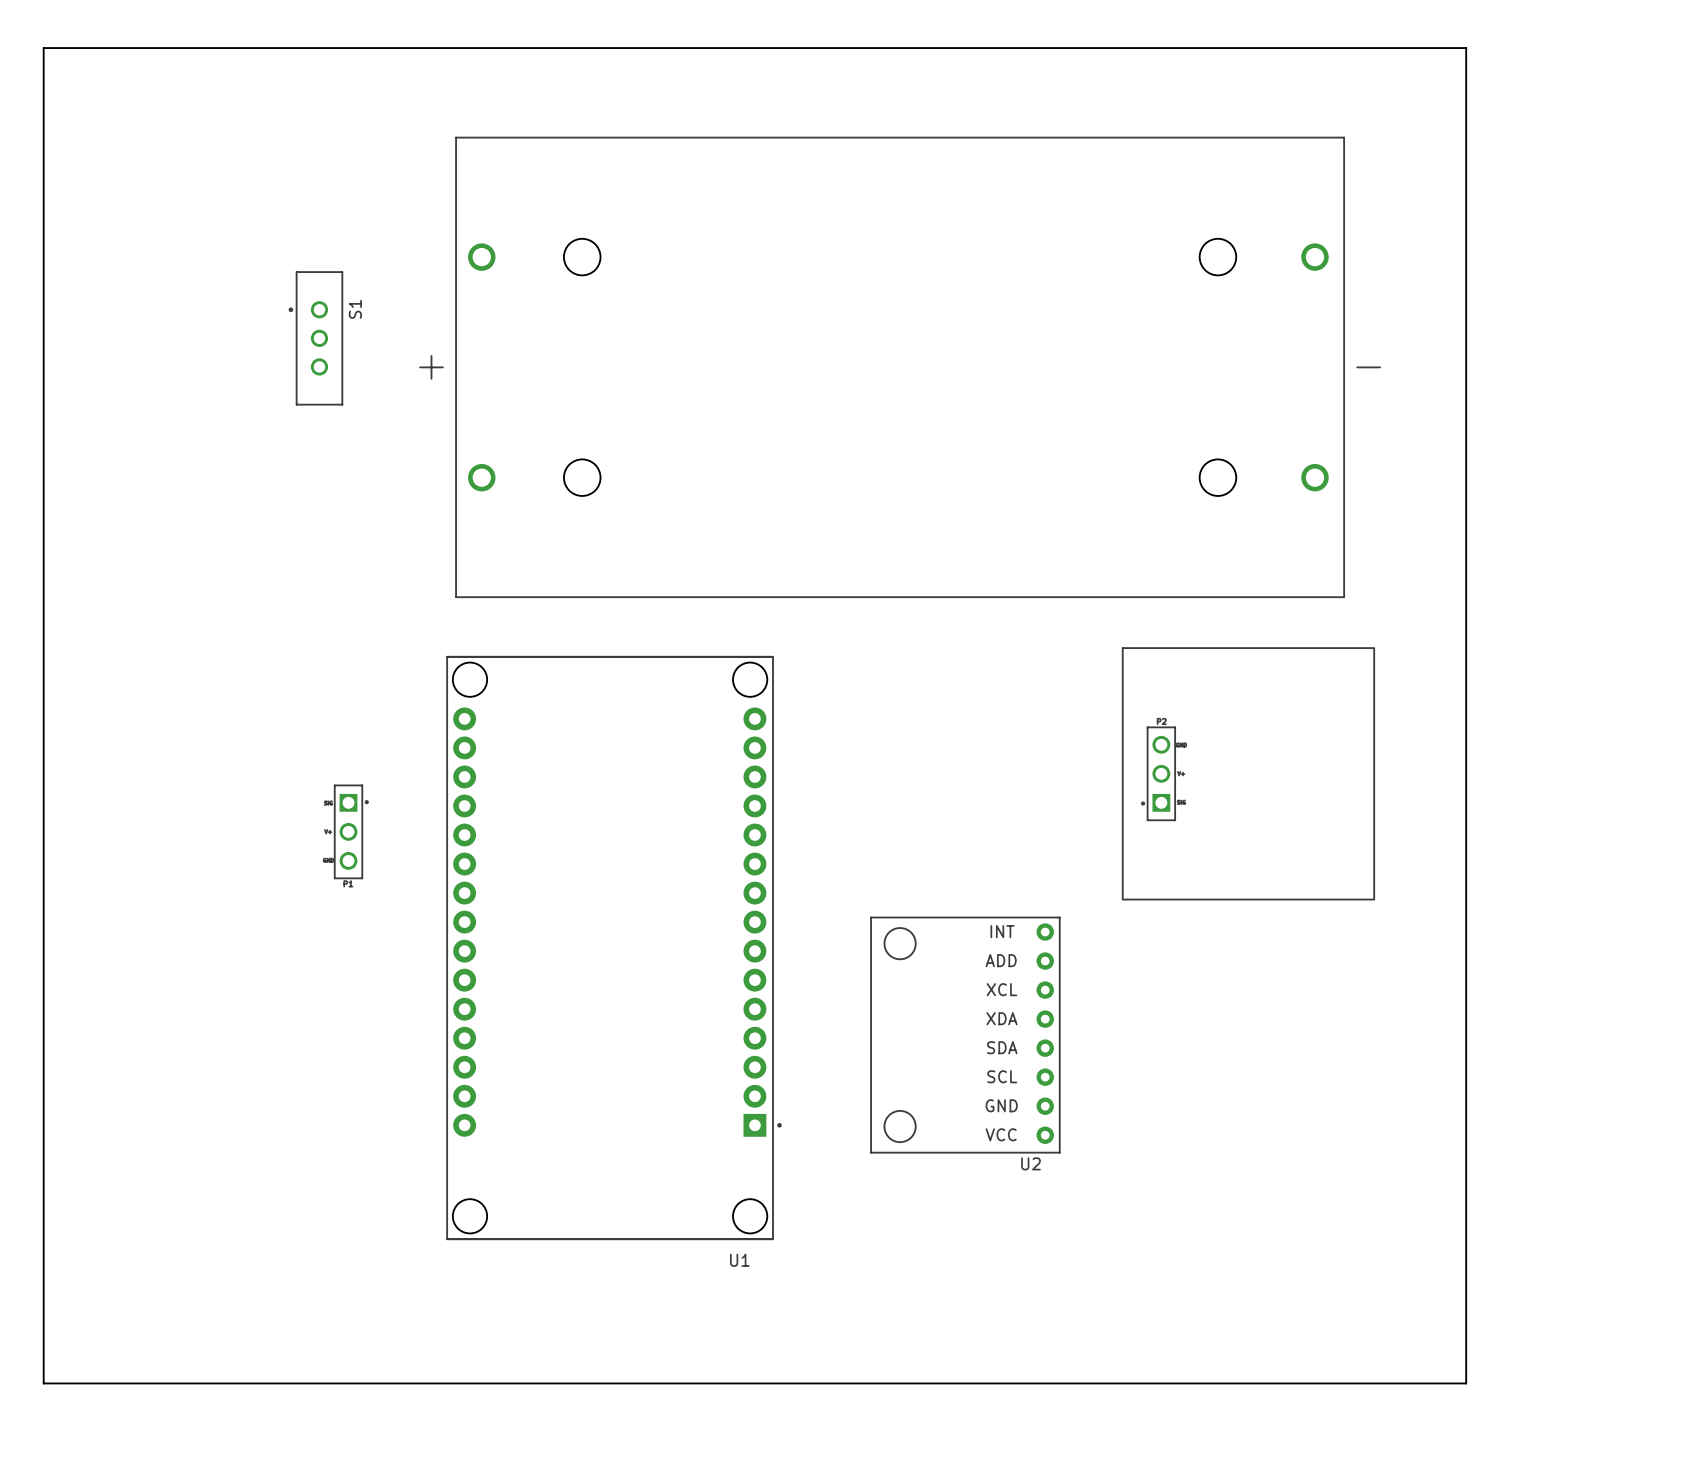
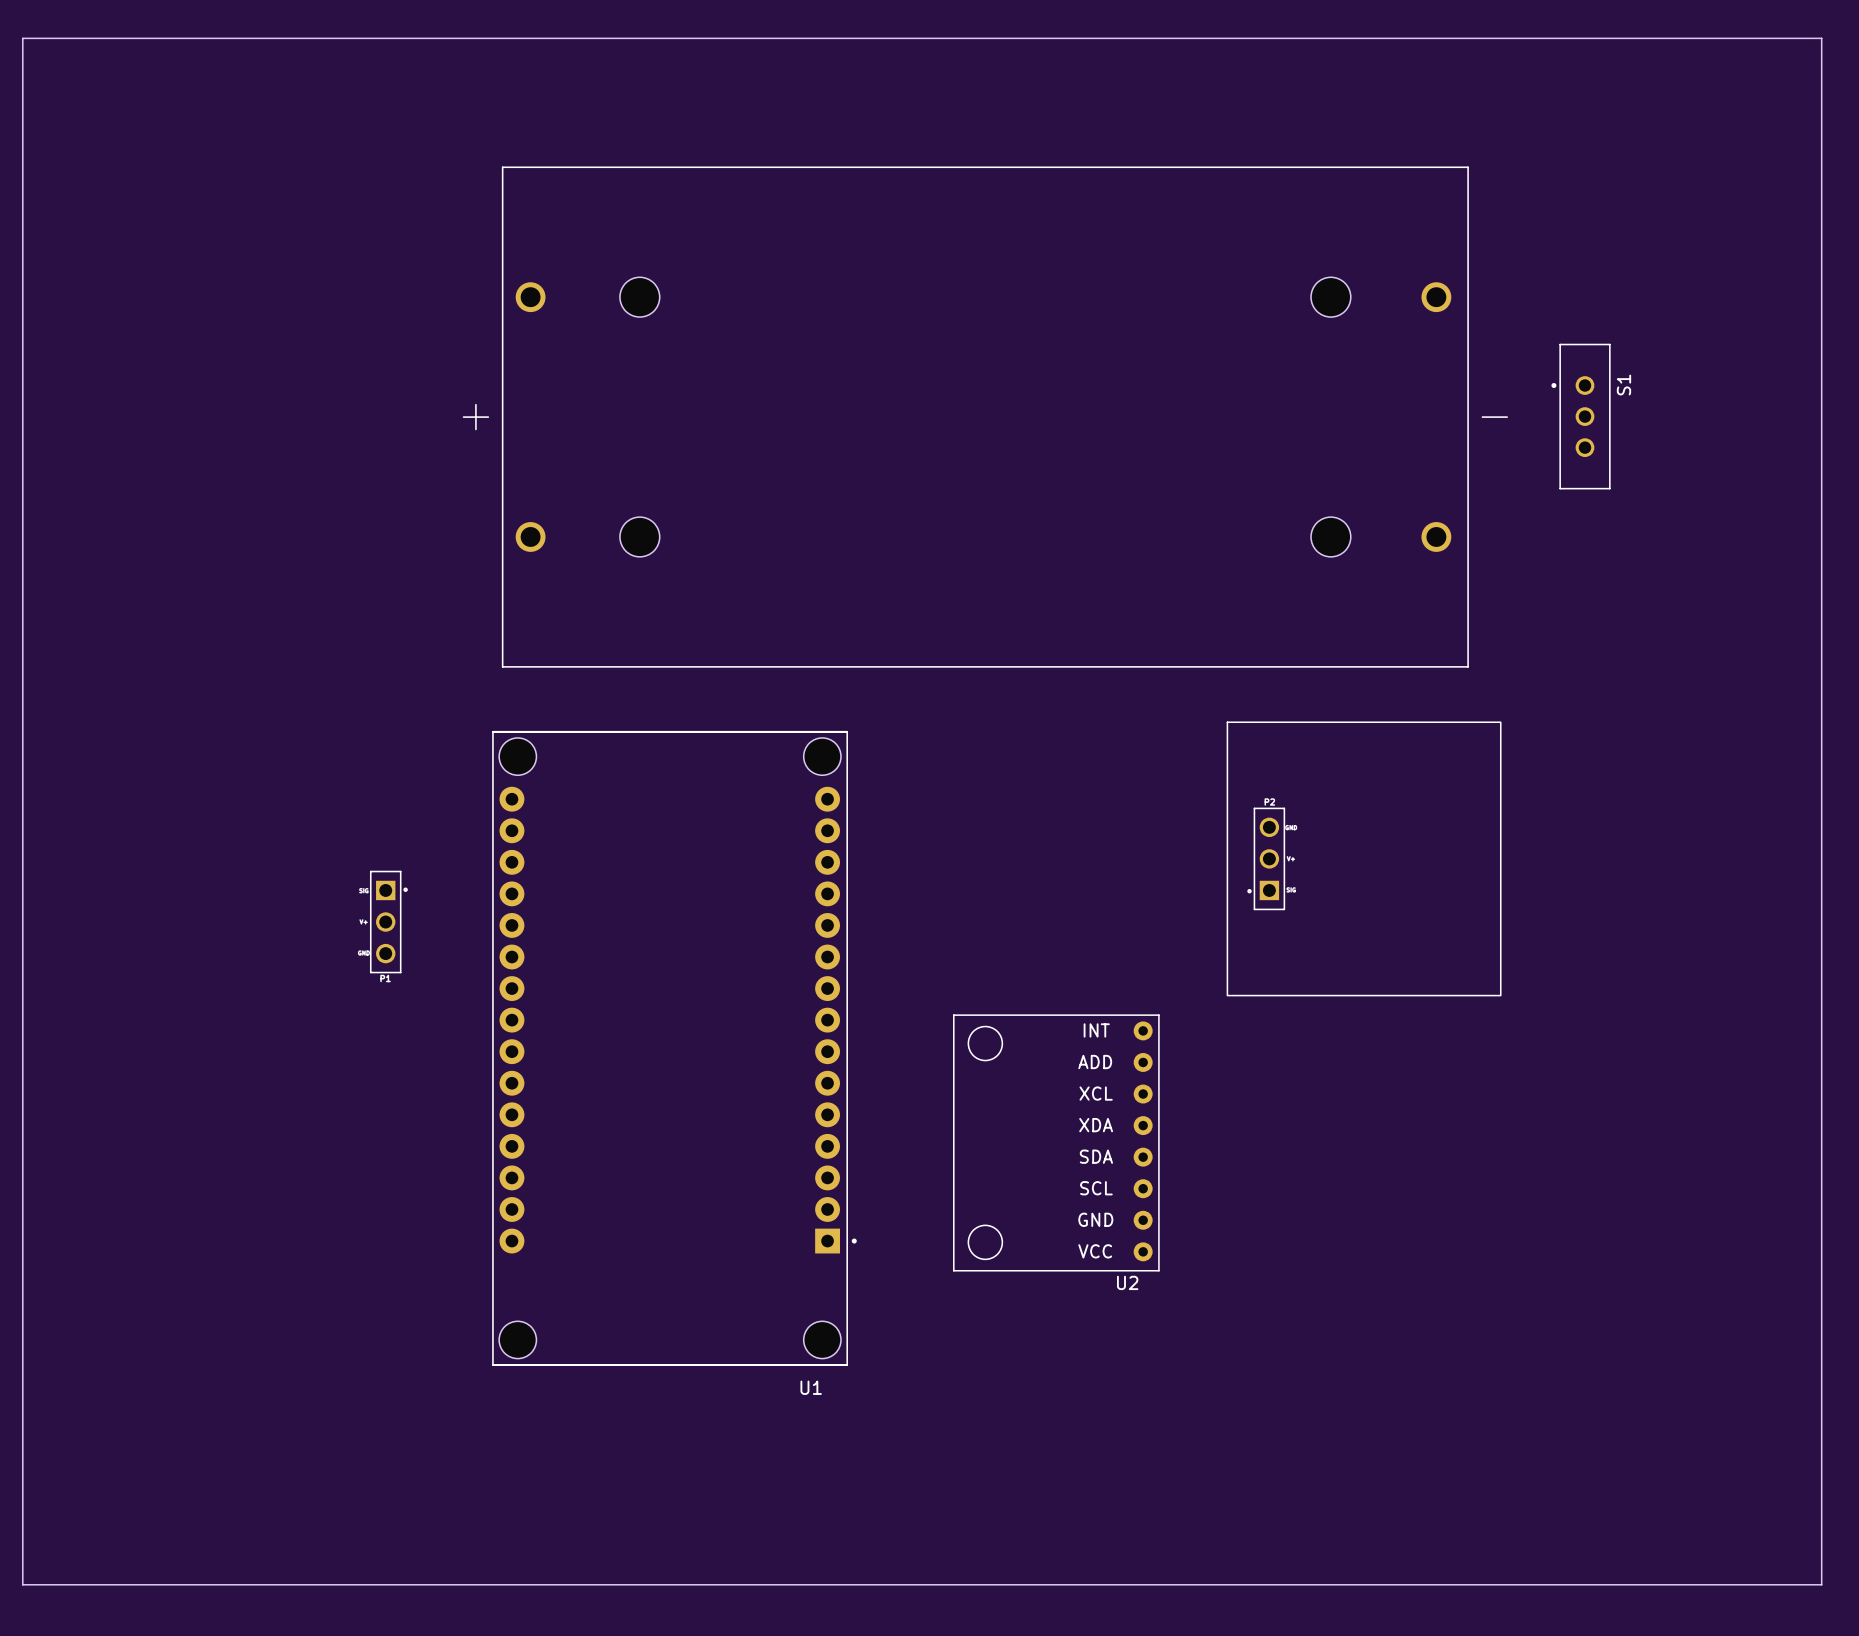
board edge: (43, 48) (1466, 48) (1466, 1383) (43, 1383) (43, 48) -> (22, 38) (22, 1584) (1821, 1584) (1821, 38) (22, 38)
S1 position: (315, 338) -> (1581, 416)

